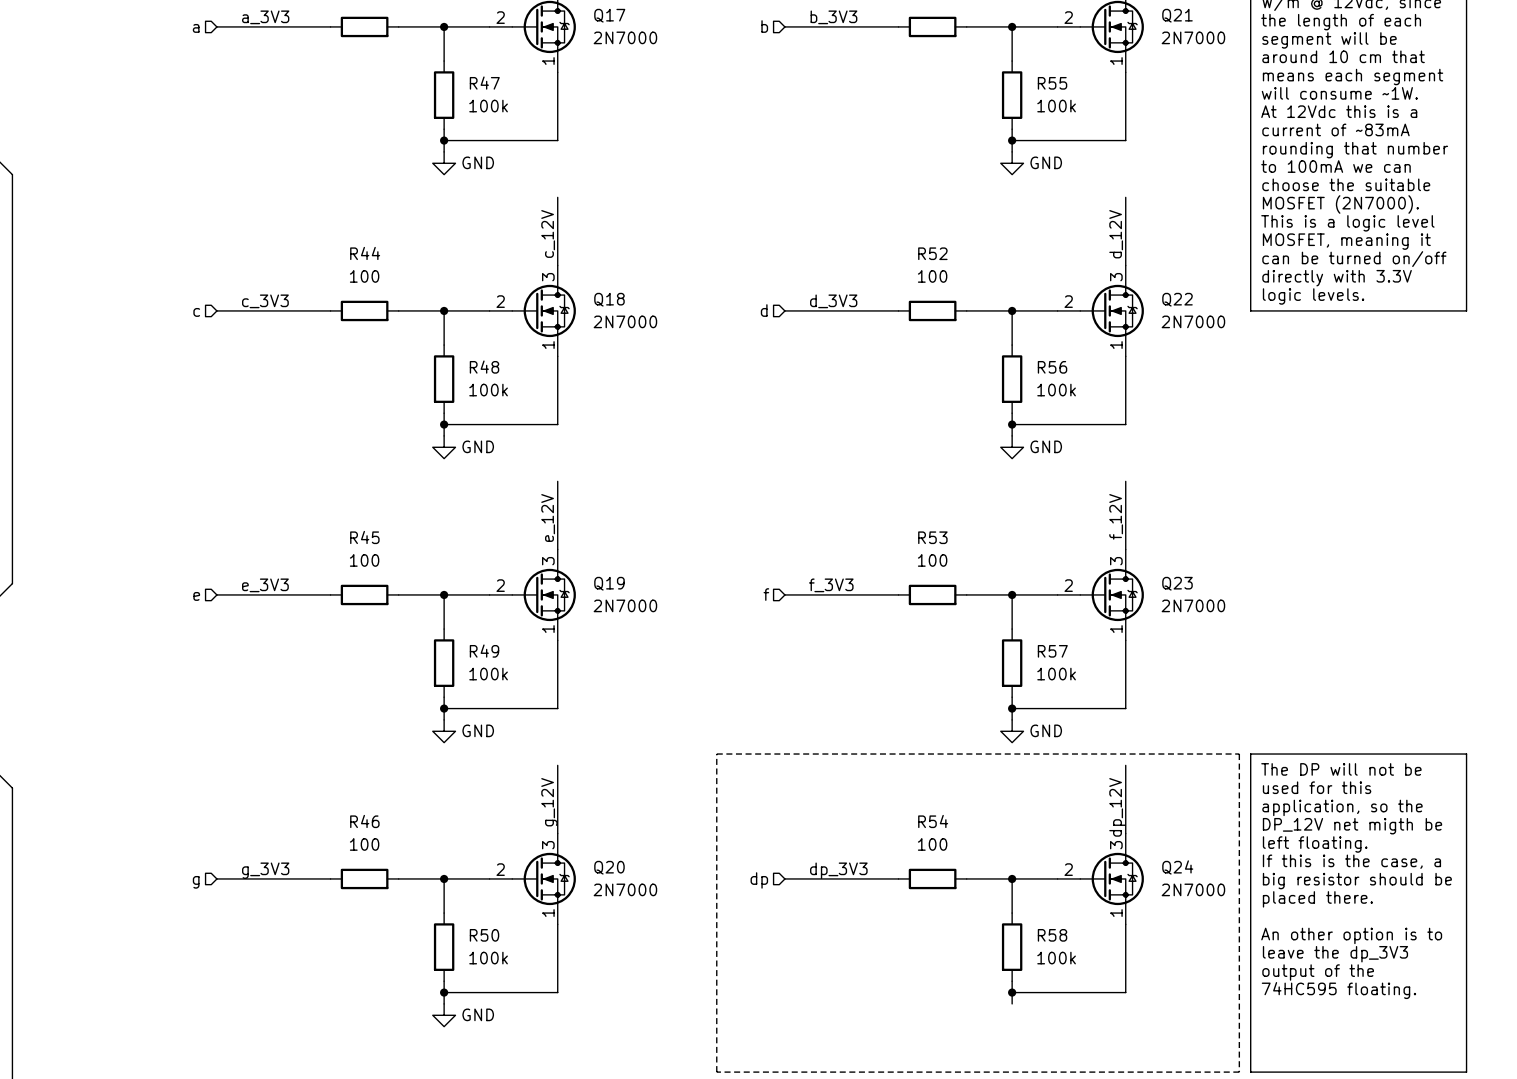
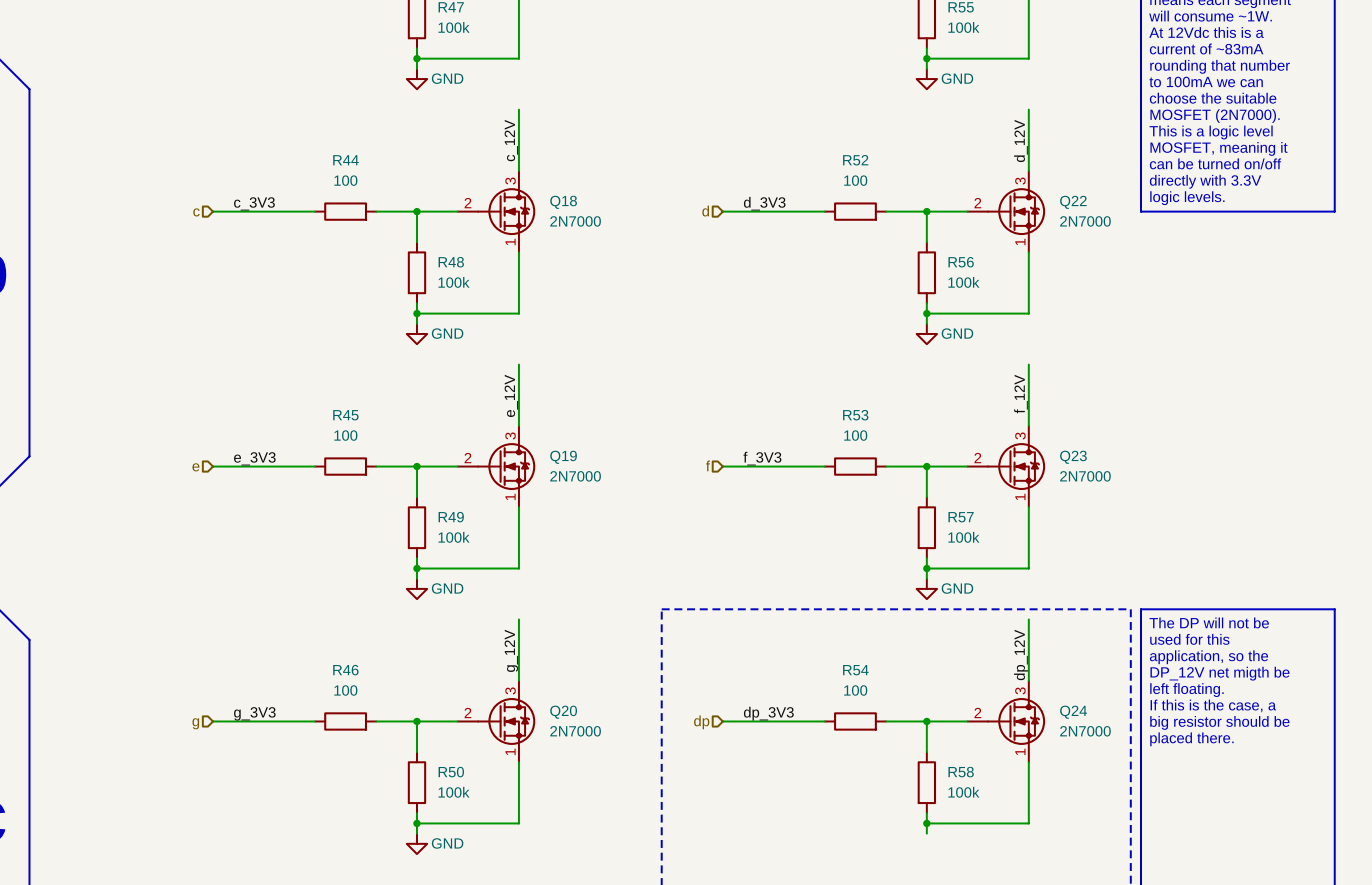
text: An other option is to (1351, 935) -> none
text: leave the dp_3V3 (1335, 954) -> none
text: output of the (1318, 972) -> none
text: 74HC595 floating. (1338, 990) -> none

